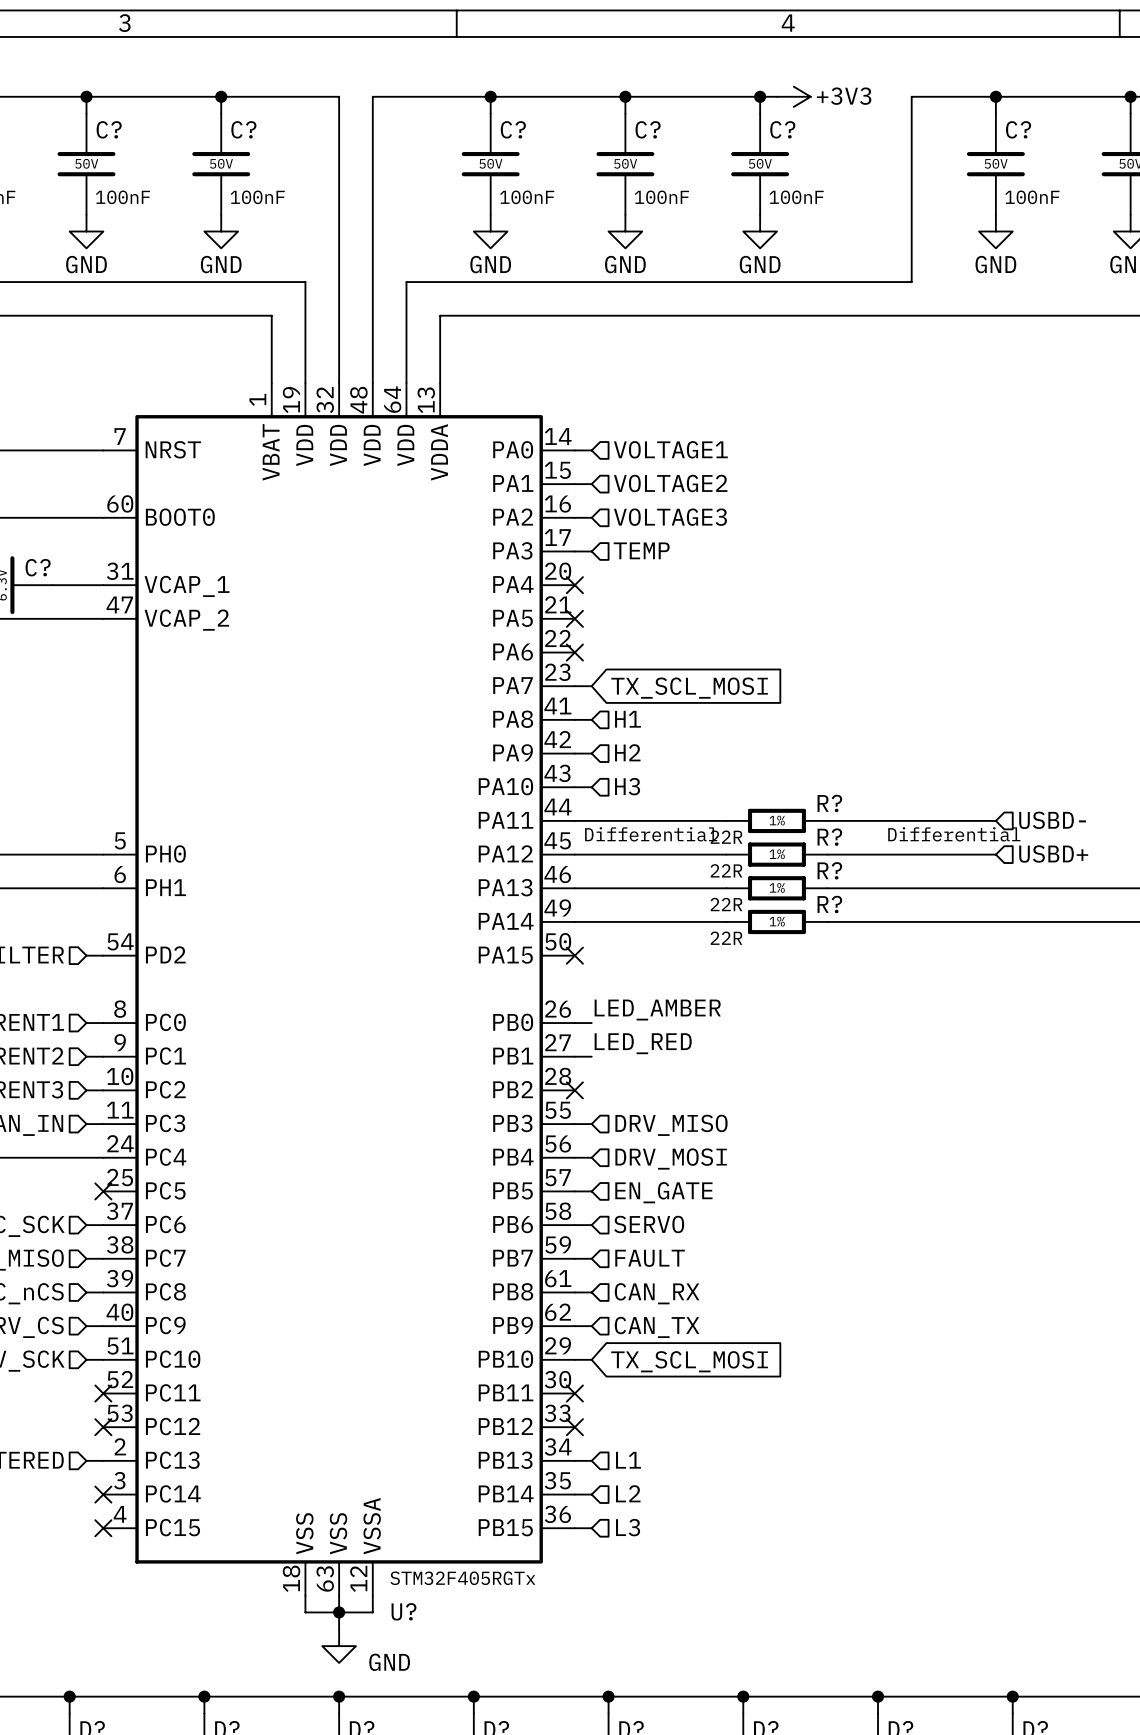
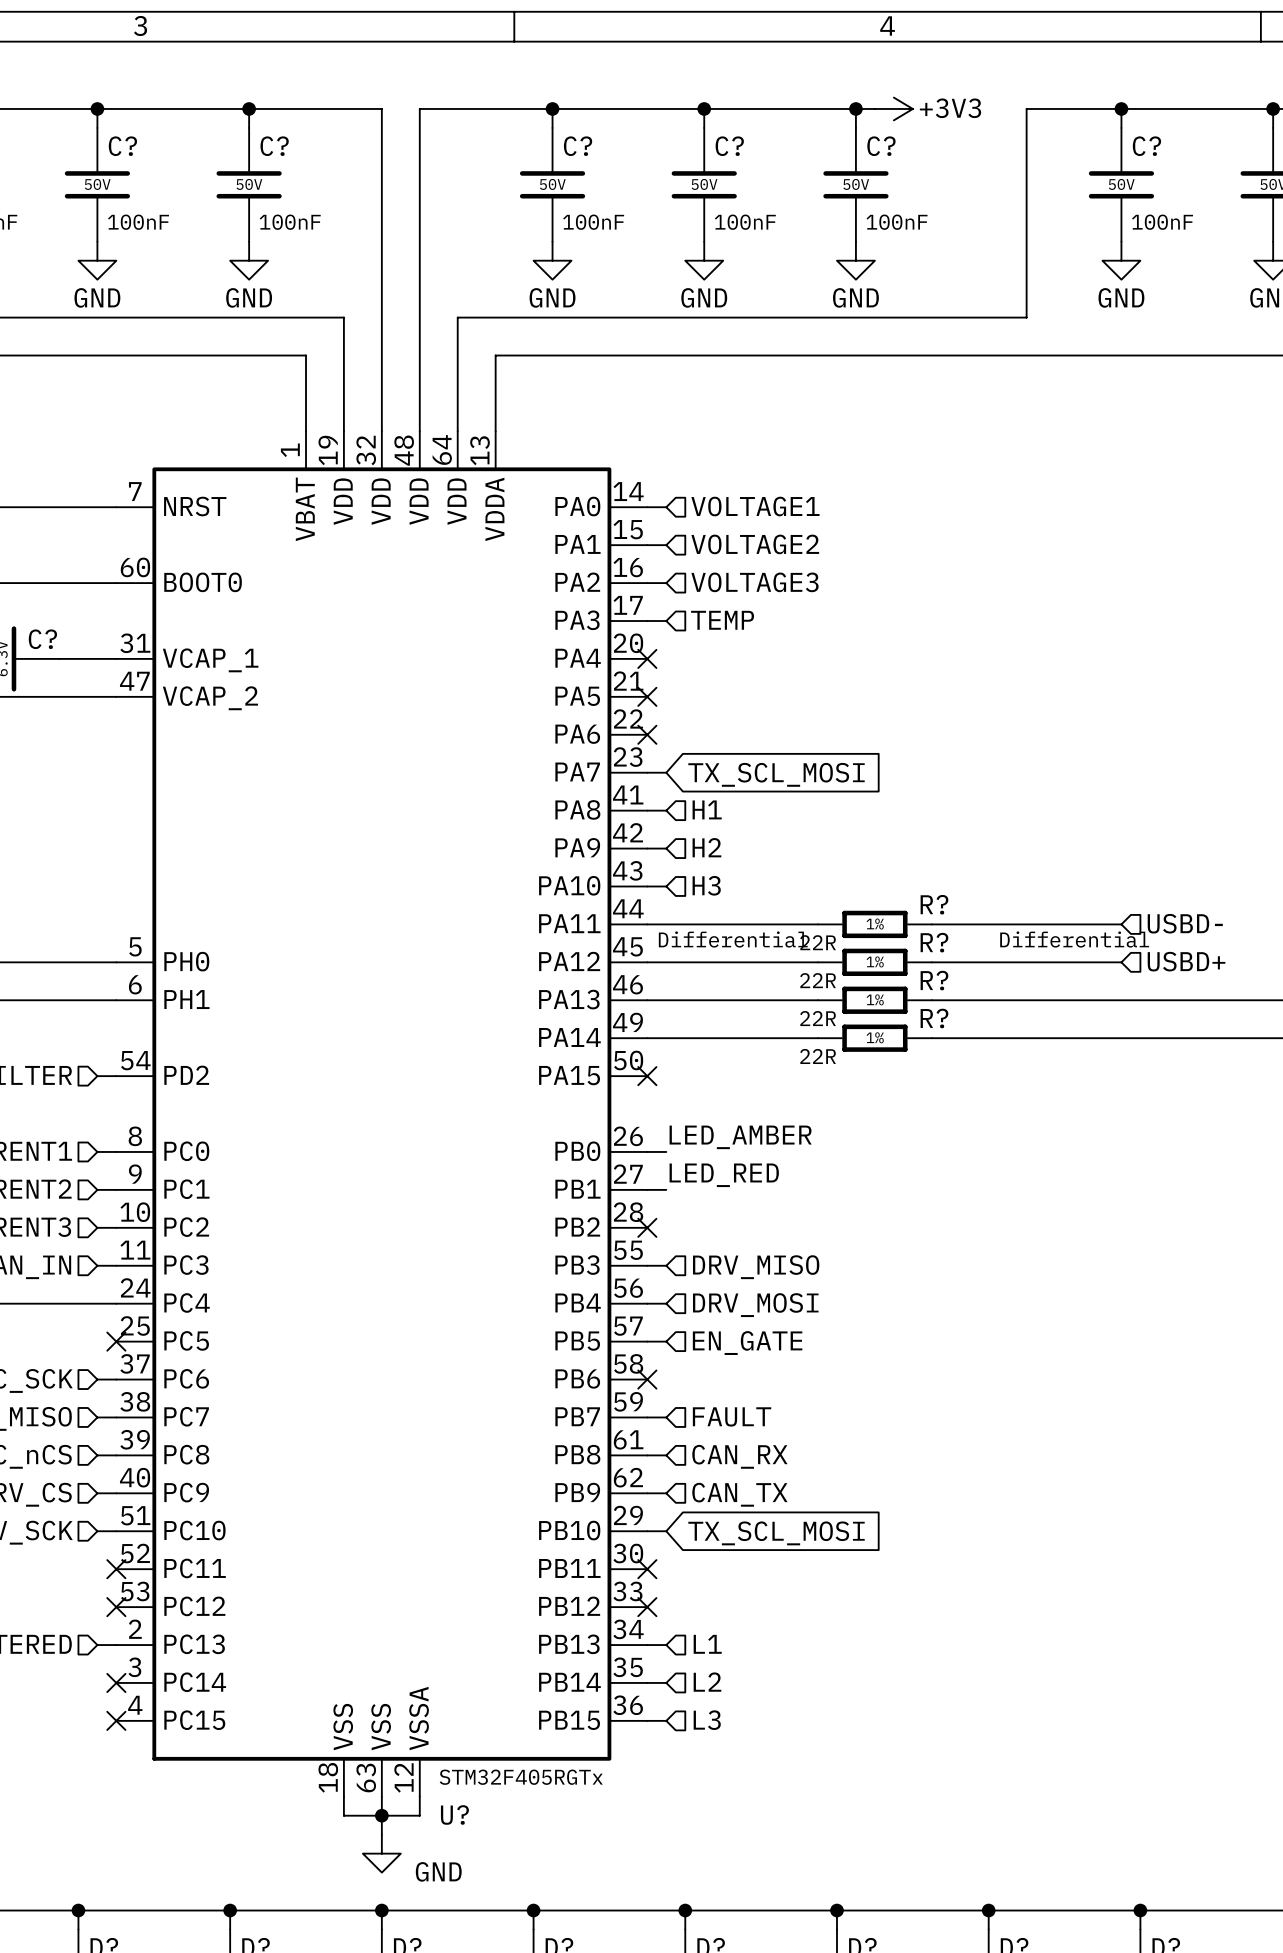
hierarchical label: SERVO (649, 1224) -> none
wire: (574, 1225) (591, 1225) -> none
no-connect mark: none -> (647, 1379)

